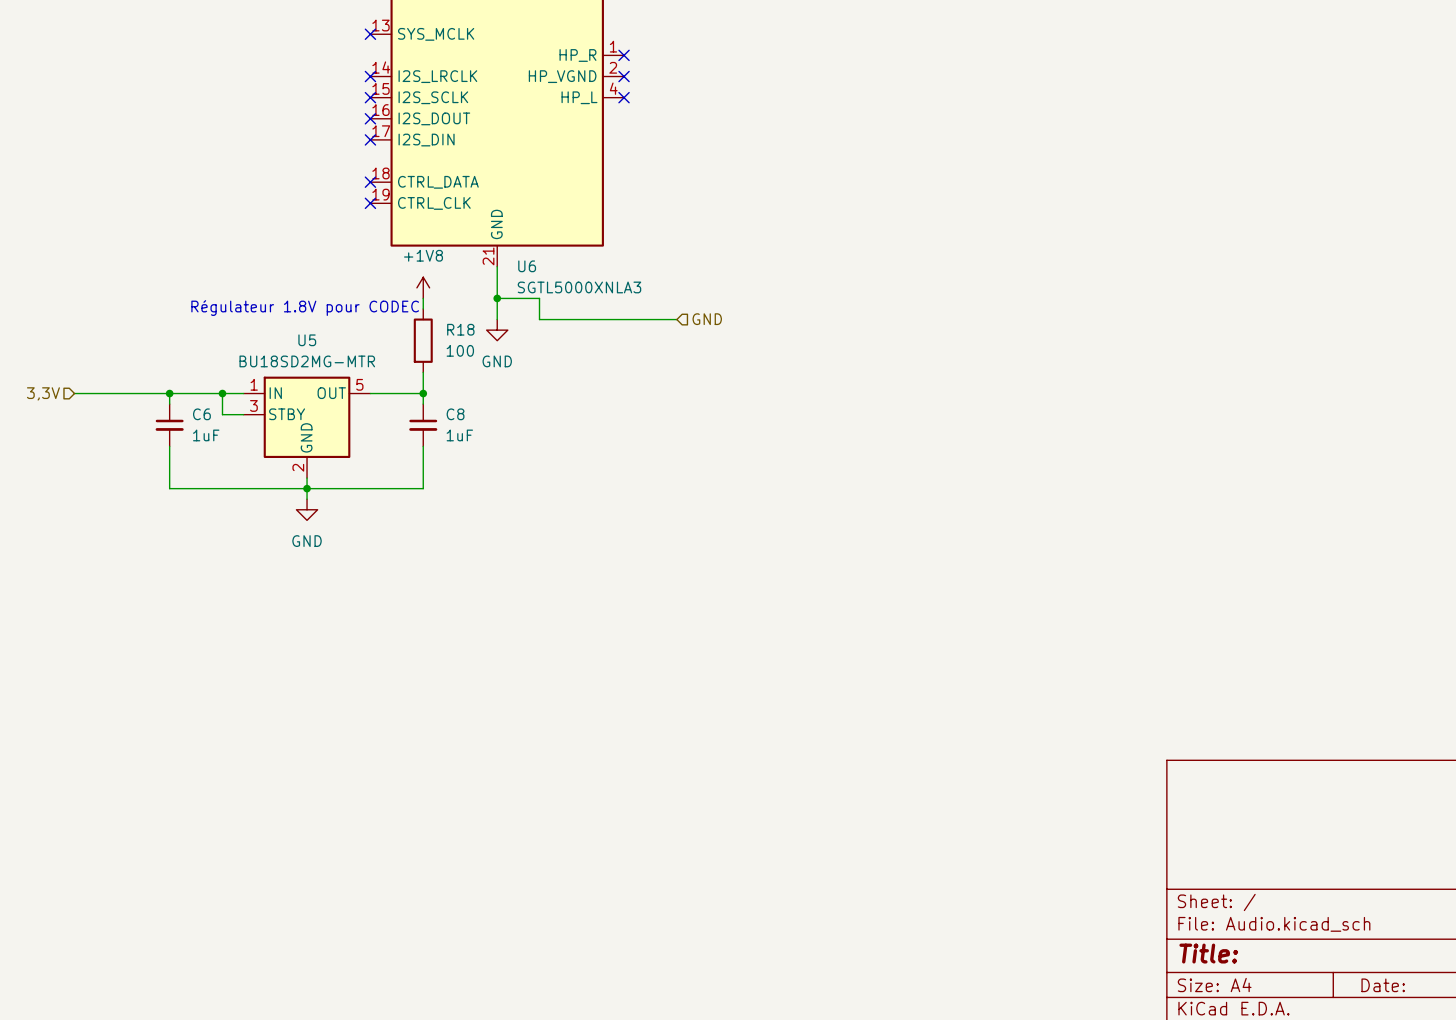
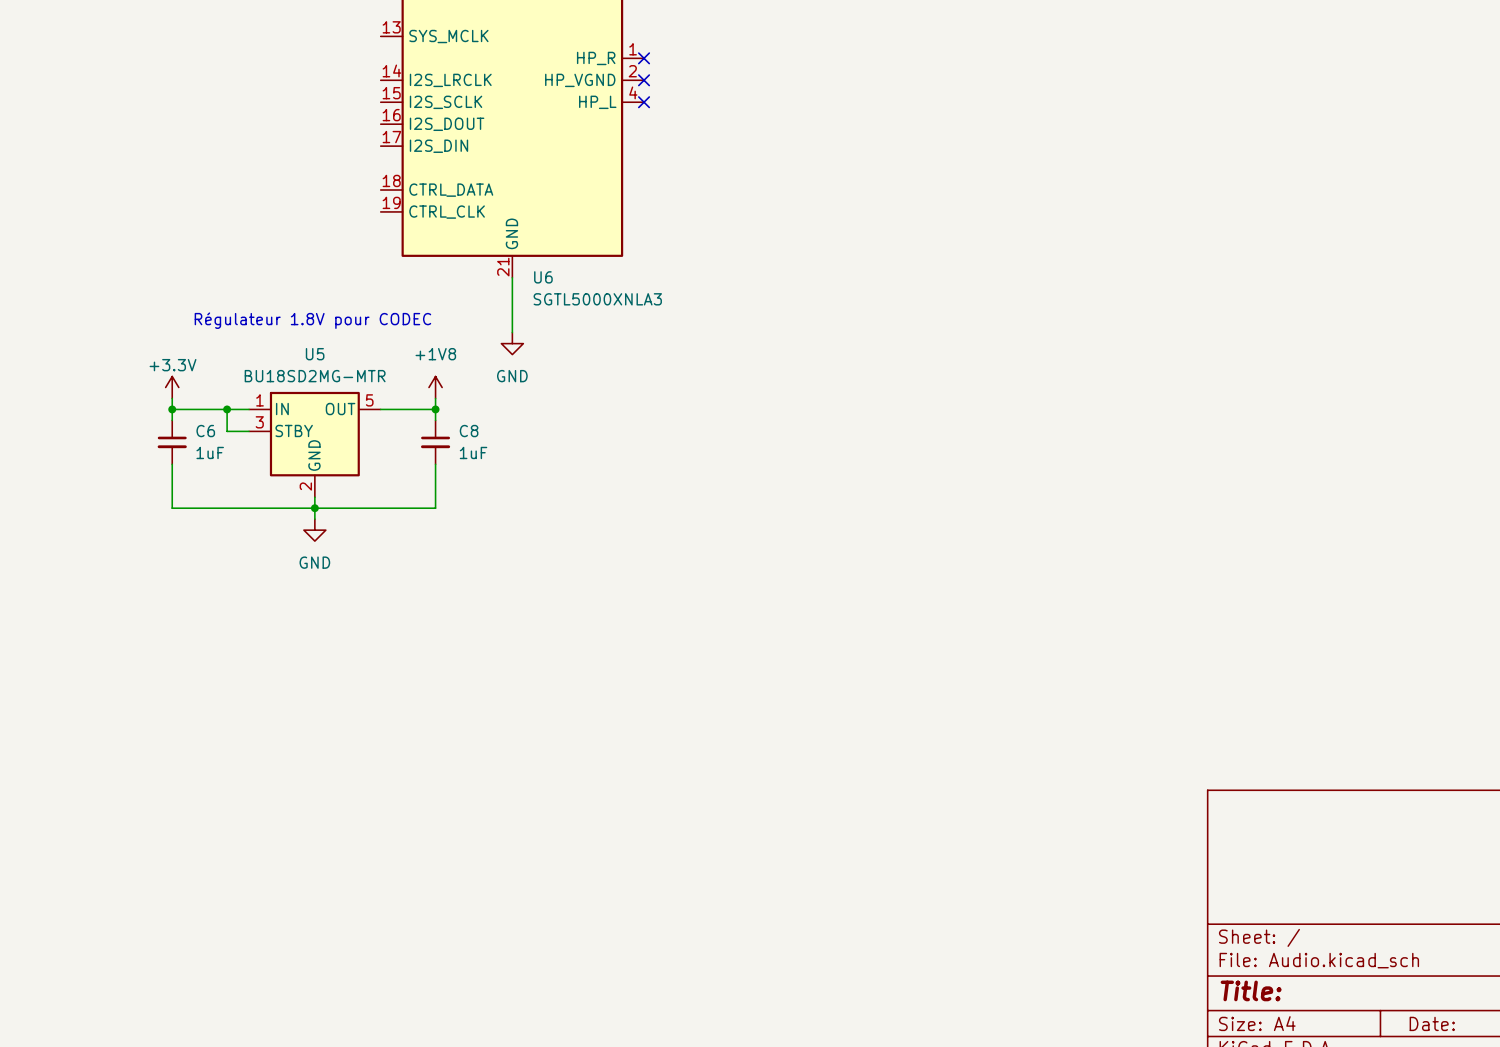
no-connect mark: (370, 34) -> none
no-connect mark: (370, 76) -> none
no-connect mark: (370, 97) -> none
no-connect mark: (370, 118) -> none
no-connect mark: (370, 139) -> none
no-connect mark: (370, 182) -> none
no-connect mark: (370, 203) -> none
power symbol position: +1V8 (423, 287) -> +1V8 (435, 387)
wire: (423, 298) (423, 308) -> none
wire: (497, 298) (539, 298) (539, 319) (676, 319) -> none
junction: (497, 298) -> none
hierarchical label: GND (707, 319) -> none
R18: 100 (423, 340) -> none
power symbol: none -> +3.3V (172, 387)
hierarchical label: 3,3V (43, 393) -> none
wire: (74, 393) (169, 393) -> (172, 398) (172, 409)

